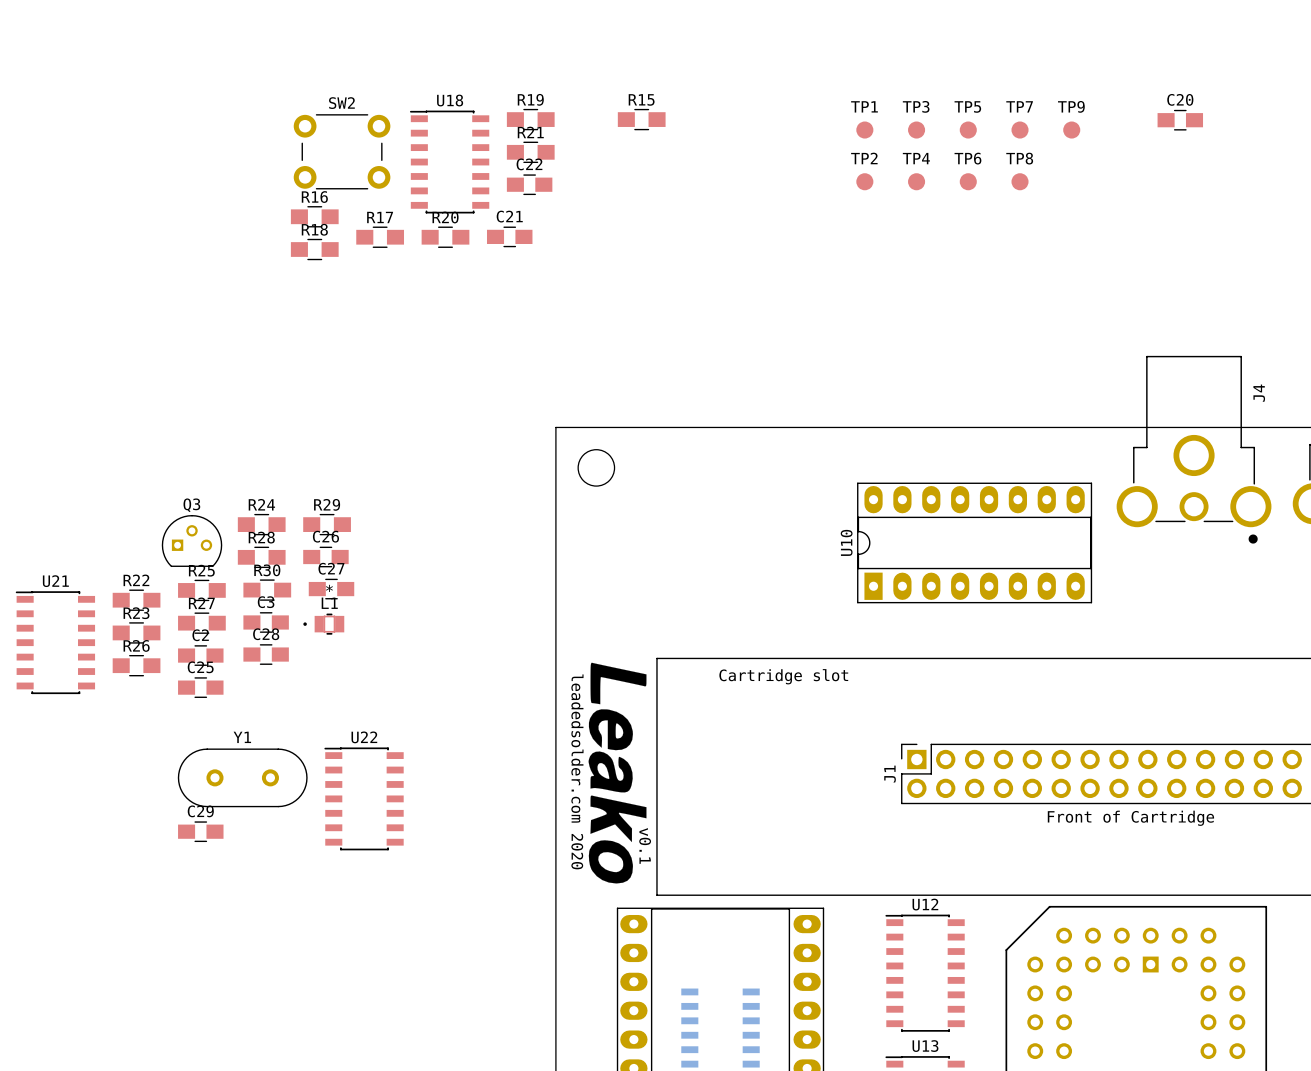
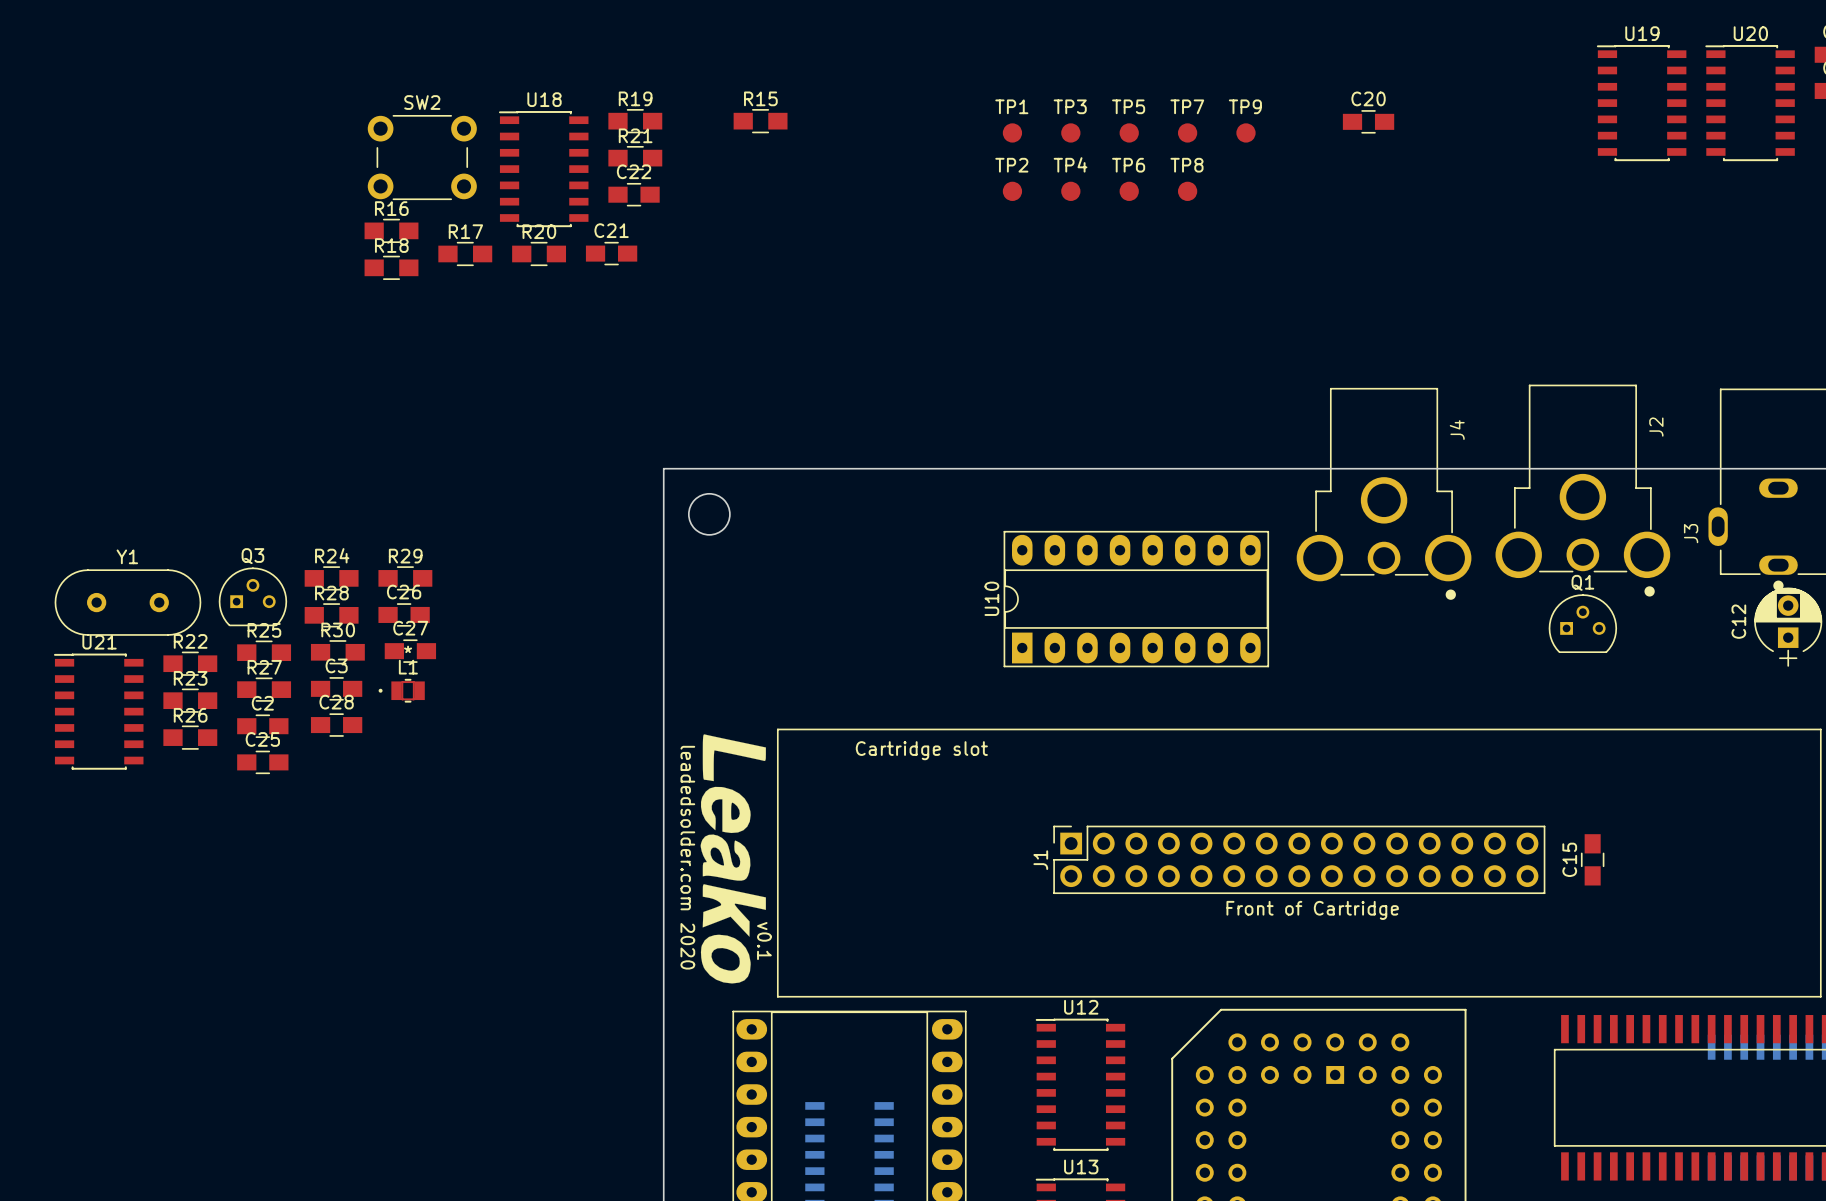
Y1 position: (242, 777) -> (127, 602)
U22: (364, 798) -> none
C29: (200, 831) -> none

